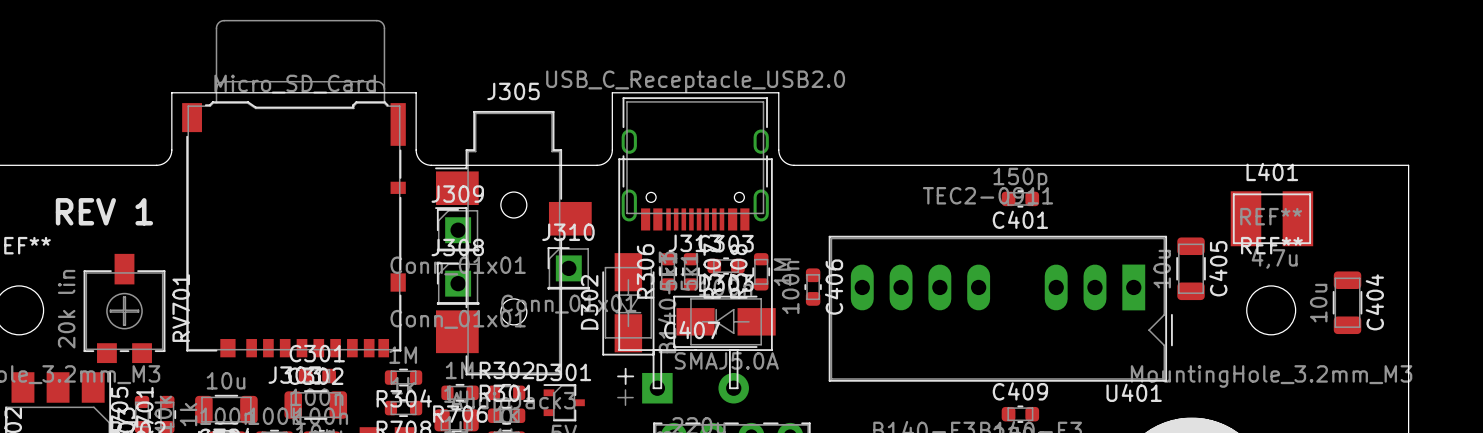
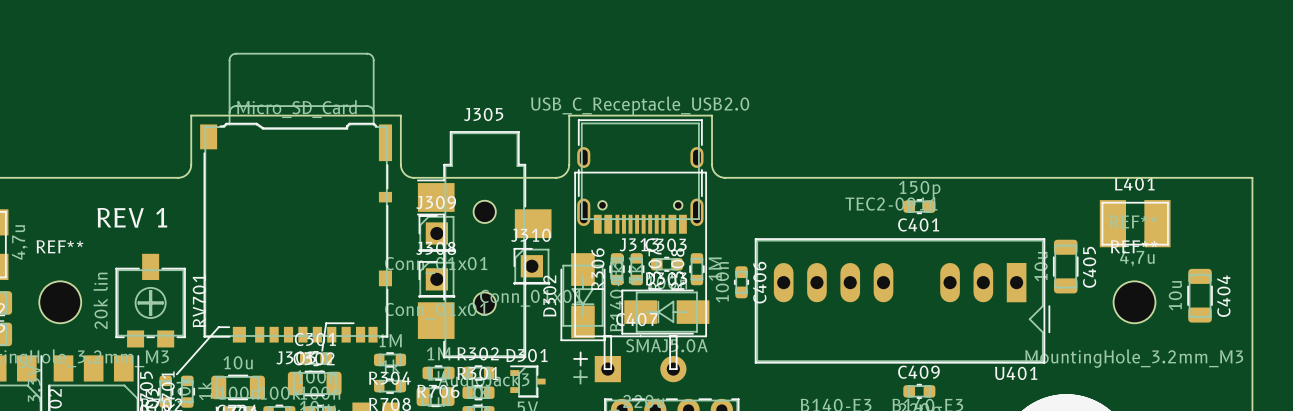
line: none -> (353, 323) (326, 323) (322, 350)
line: none -> (229, 327) (218, 327) (176, 374)

